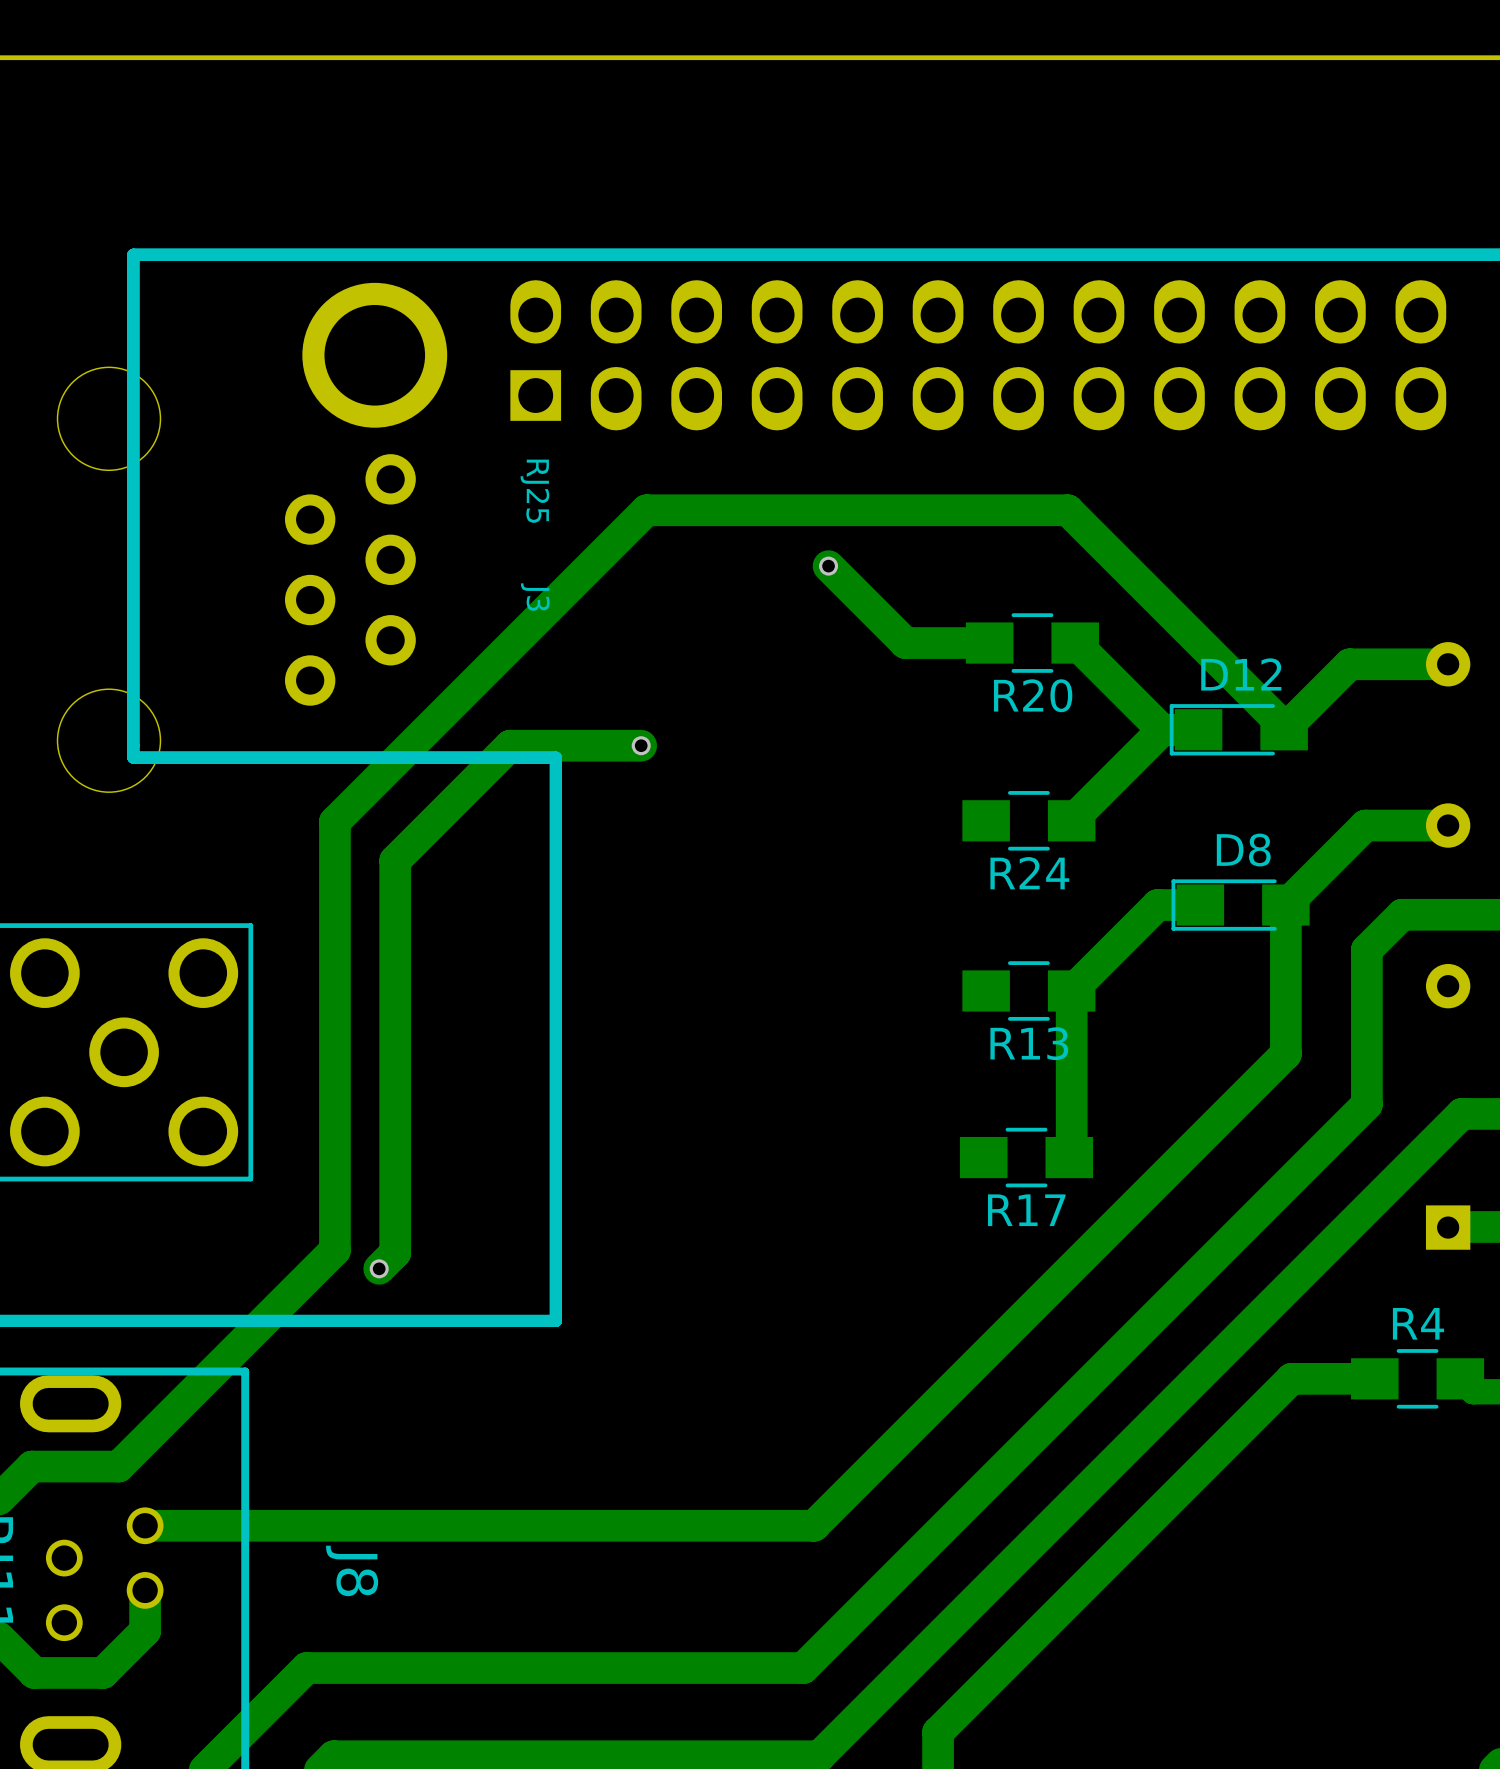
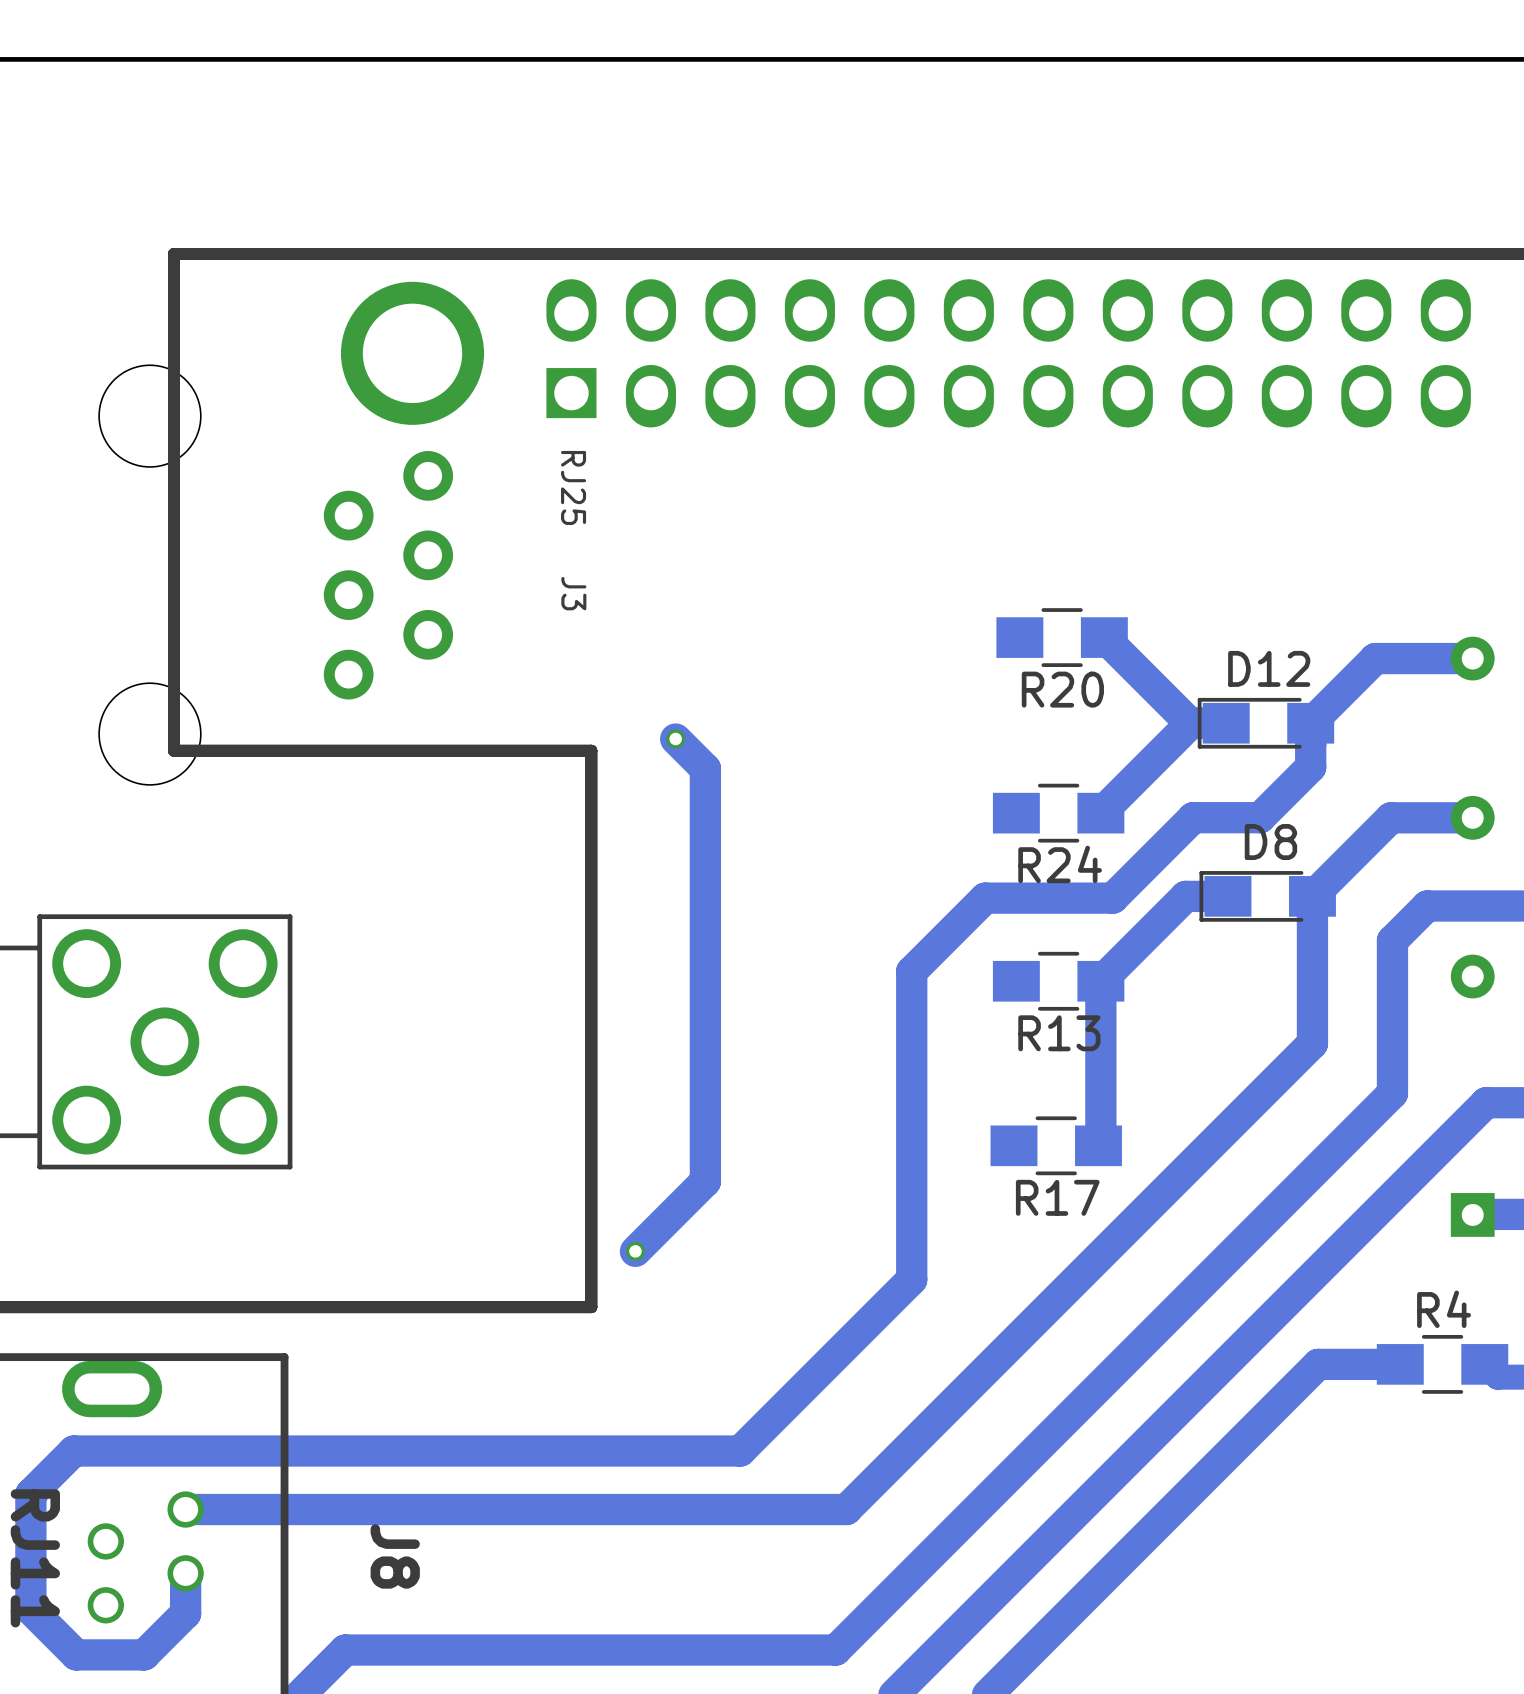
track: (828, 566) (905, 643) (989, 643) -> none
via: (828, 566) -> none
track: (1284, 729) (1284, 726) (1067, 510) (646, 510) (334, 821) (334, 1250) (118, 1466) -> (1310, 723) (1310, 767) (1260, 817) (1193, 817) (1112, 898) (985, 898) (911, 971) (911, 1279) (740, 1451) (159, 1451)
track: (641, 745) (510, 745) (395, 860) (395, 1252) (379, 1268) -> (675, 739) (705, 768) (705, 1181) (635, 1251)
via: none -> (635, 1251)
via: (379, 1268) -> none

